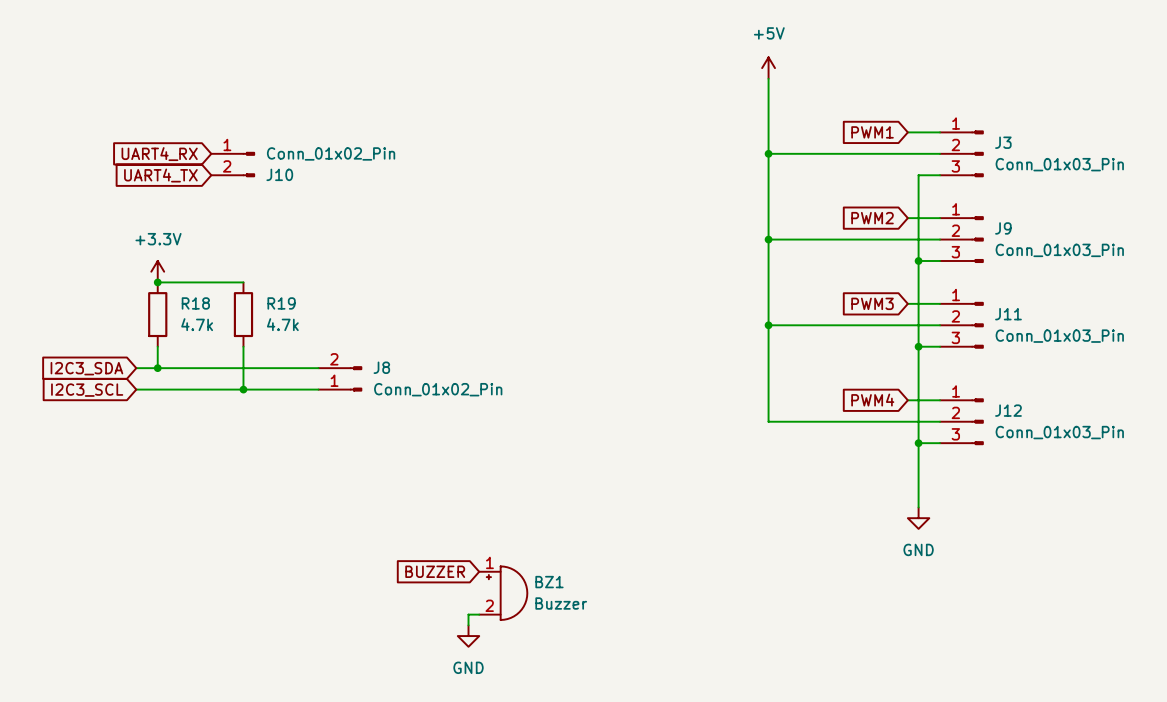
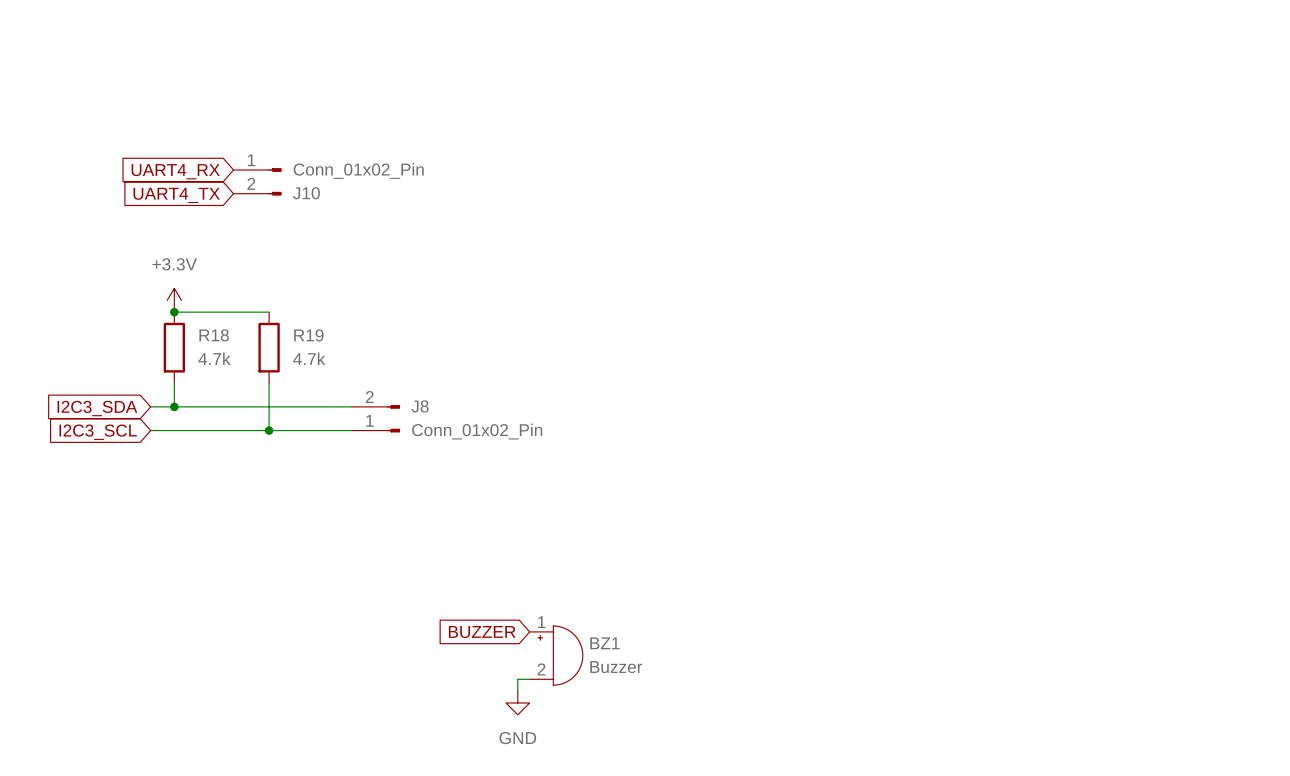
power symbol: +5V (768, 68) -> none
wire: (768, 78) (768, 421) (940, 421) -> none
global label: PWM1 (872, 132) -> none
wire: (907, 132) (940, 132) -> none
wire: (768, 153) (940, 153) -> none
junction: (768, 153) -> none
J3: Conn_01x03_Pin (961, 153) -> none
wire: (940, 175) (918, 175) (918, 507) -> none
global label: PWM2 (872, 218) -> none
wire: (907, 218) (940, 218) -> none
wire: (768, 239) (940, 239) -> none
junction: (768, 239) -> none
J9: Conn_01x03_Pin (961, 239) -> none
wire: (918, 260) (940, 260) -> none
junction: (918, 260) -> none
global label: PWM3 (872, 303) -> none
wire: (907, 303) (940, 303) -> none
wire: (768, 325) (940, 325) -> none
junction: (768, 325) -> none
J11: Conn_01x03_Pin (961, 325) -> none
wire: (918, 346) (940, 346) -> none
junction: (918, 346) -> none
global label: PWM4 (872, 400) -> none
wire: (907, 400) (940, 400) -> none
J12: Conn_01x03_Pin (961, 421) -> none
wire: (918, 443) (940, 443) -> none
junction: (918, 443) -> none
power symbol: GND (918, 518) -> none

